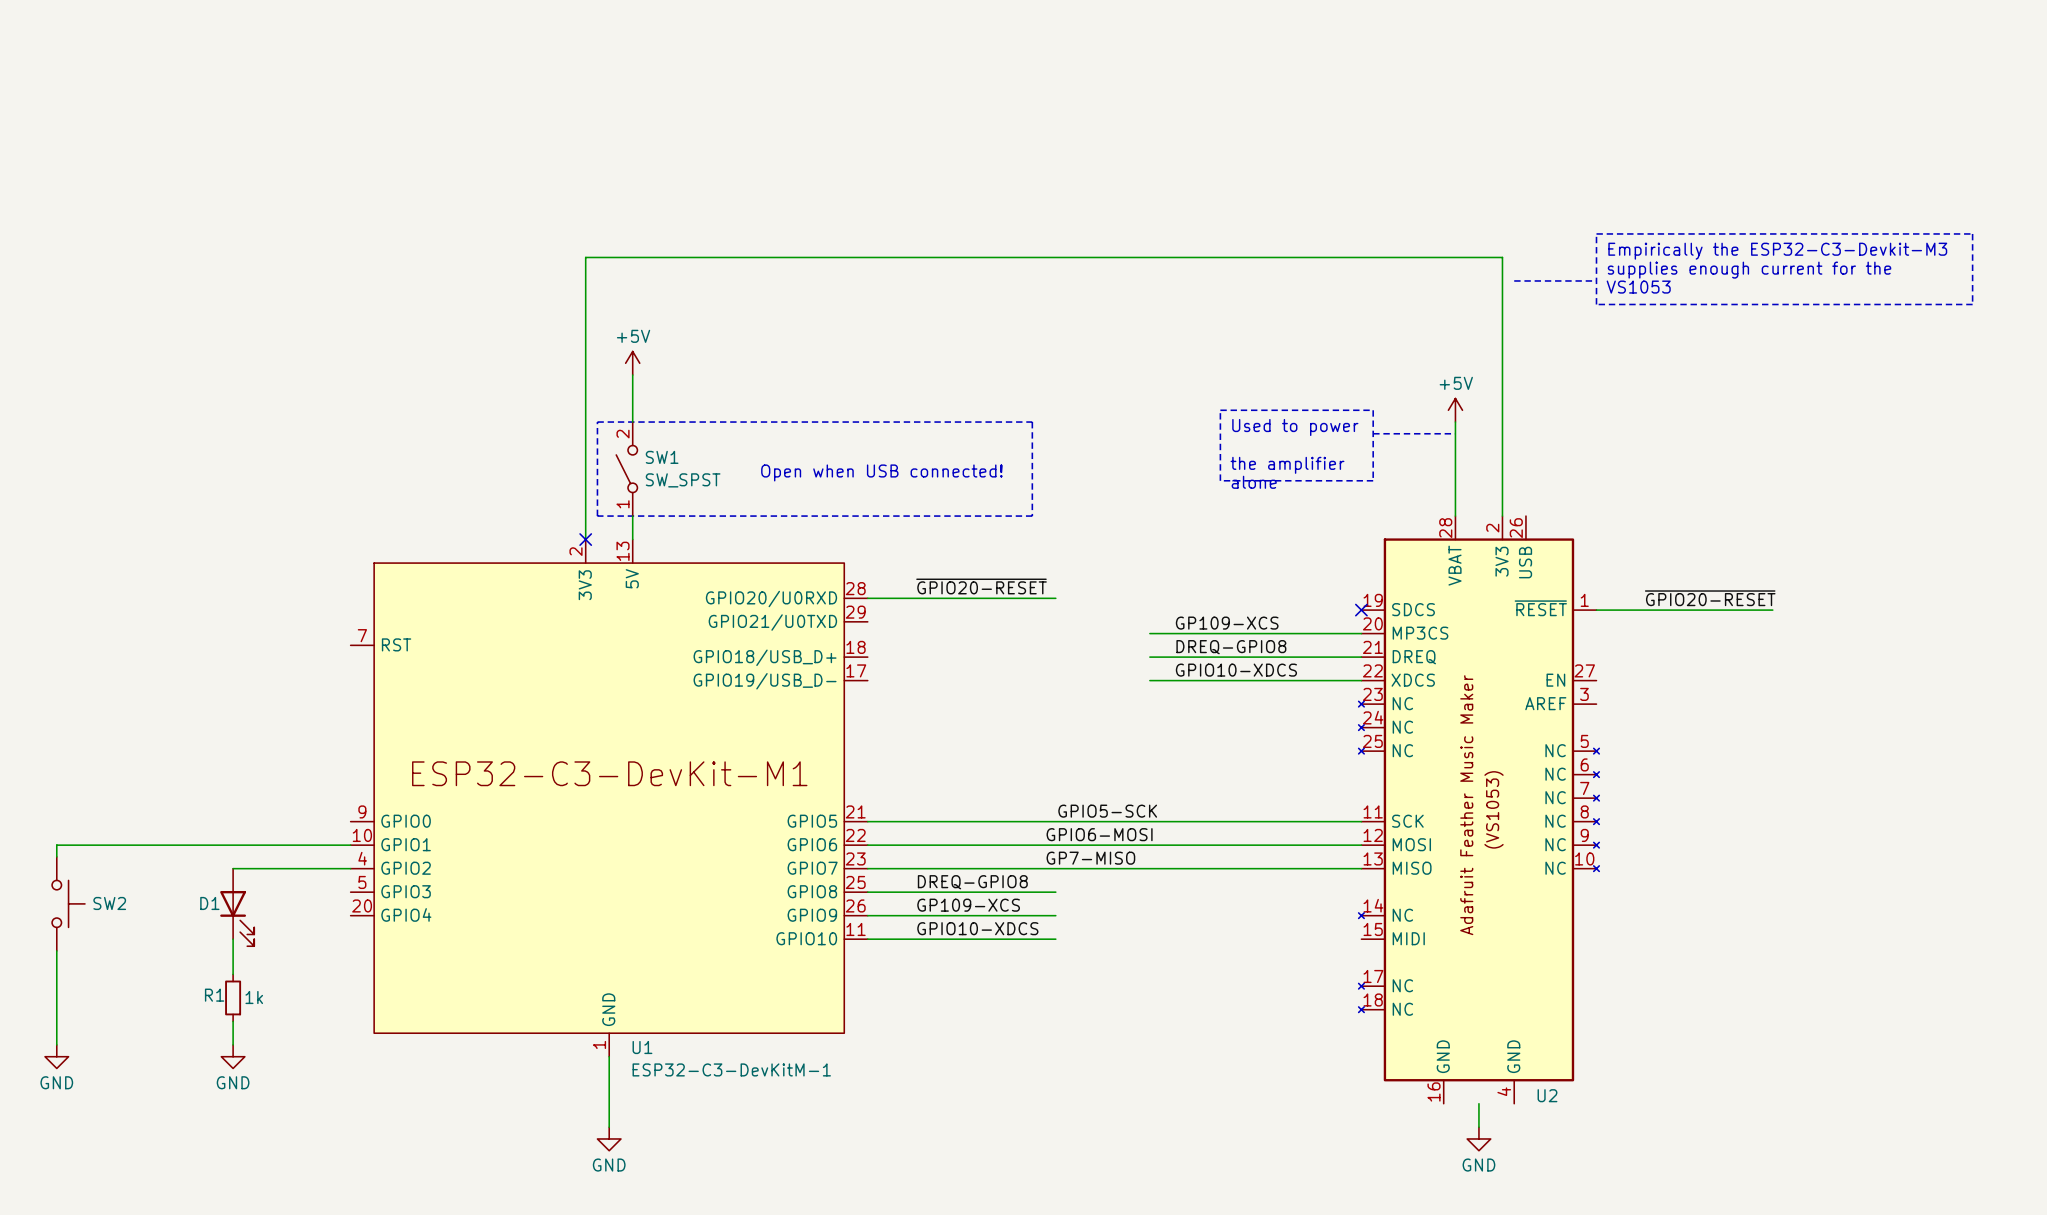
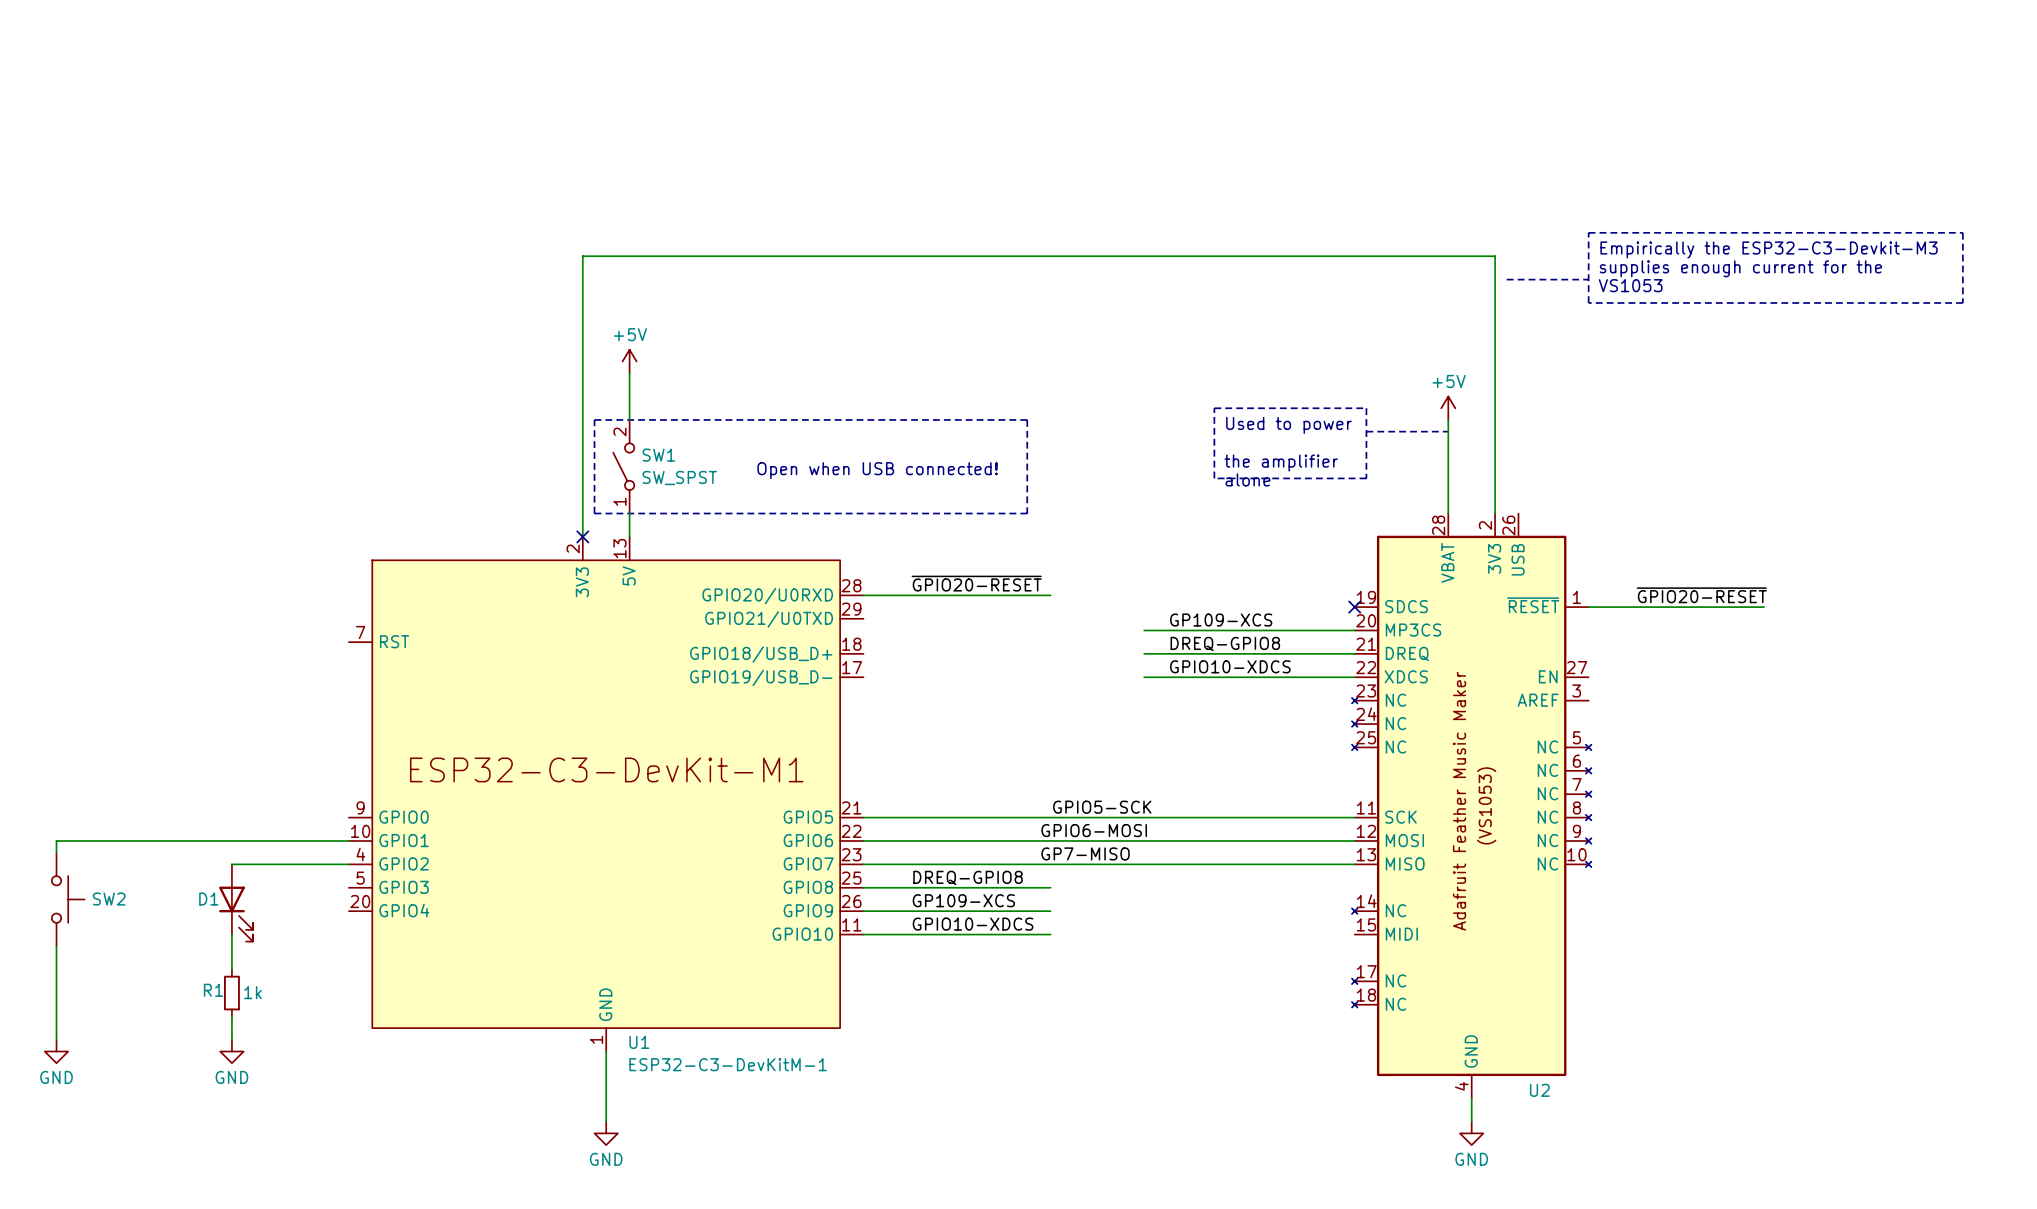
U2 symbol: [1358, 516, 1600, 1104] -> [1351, 513, 1592, 1099]

